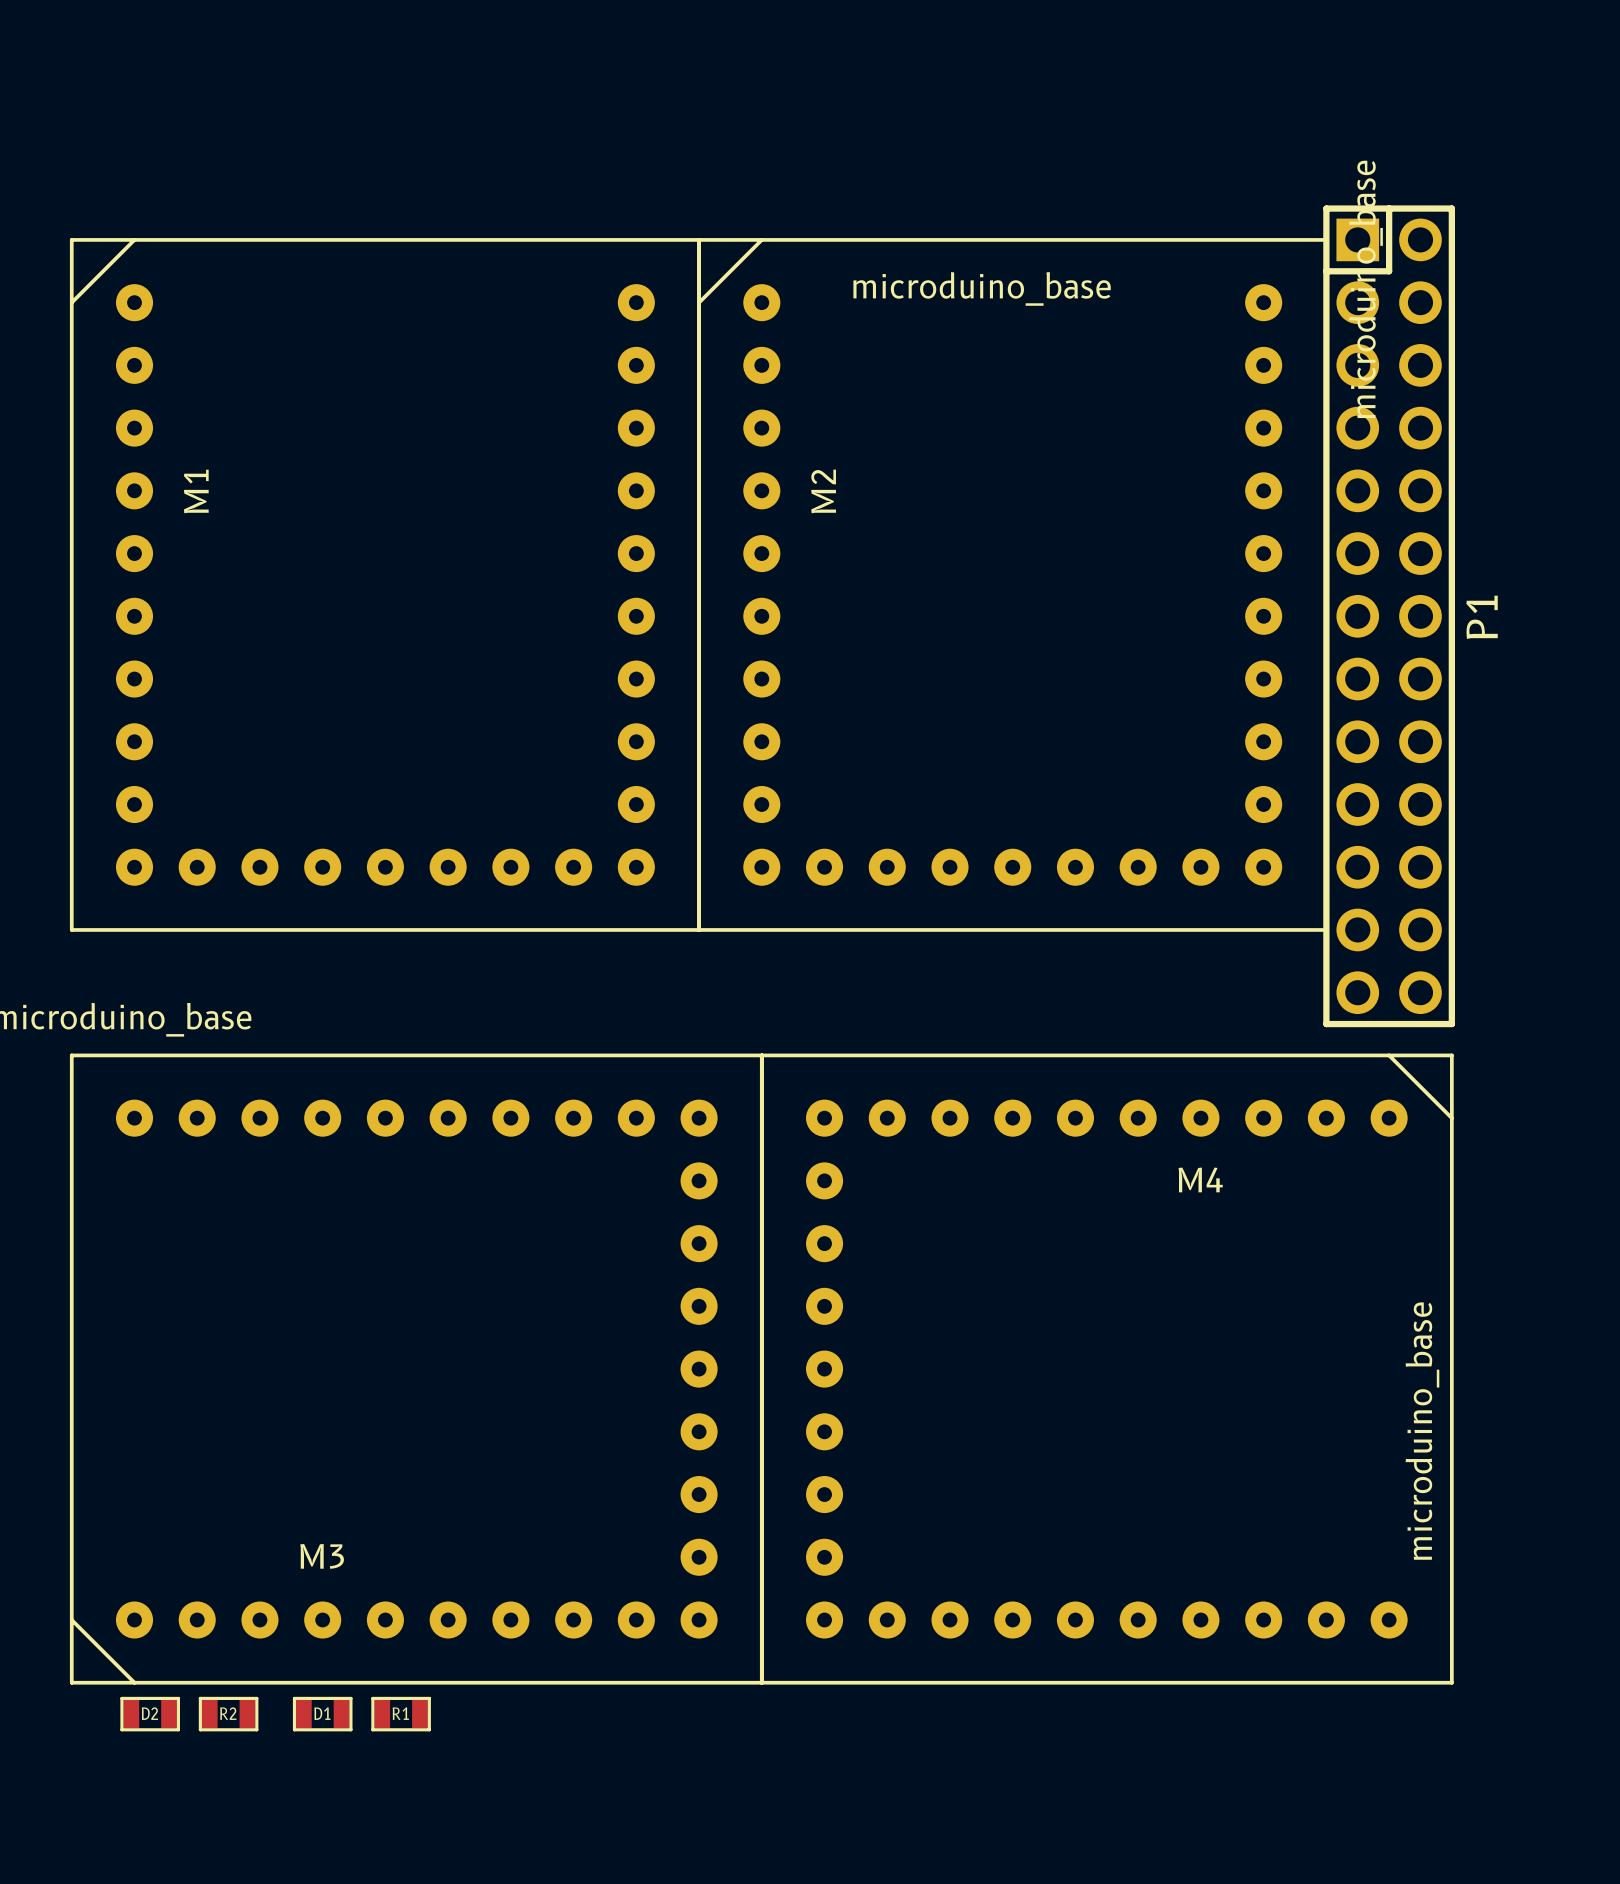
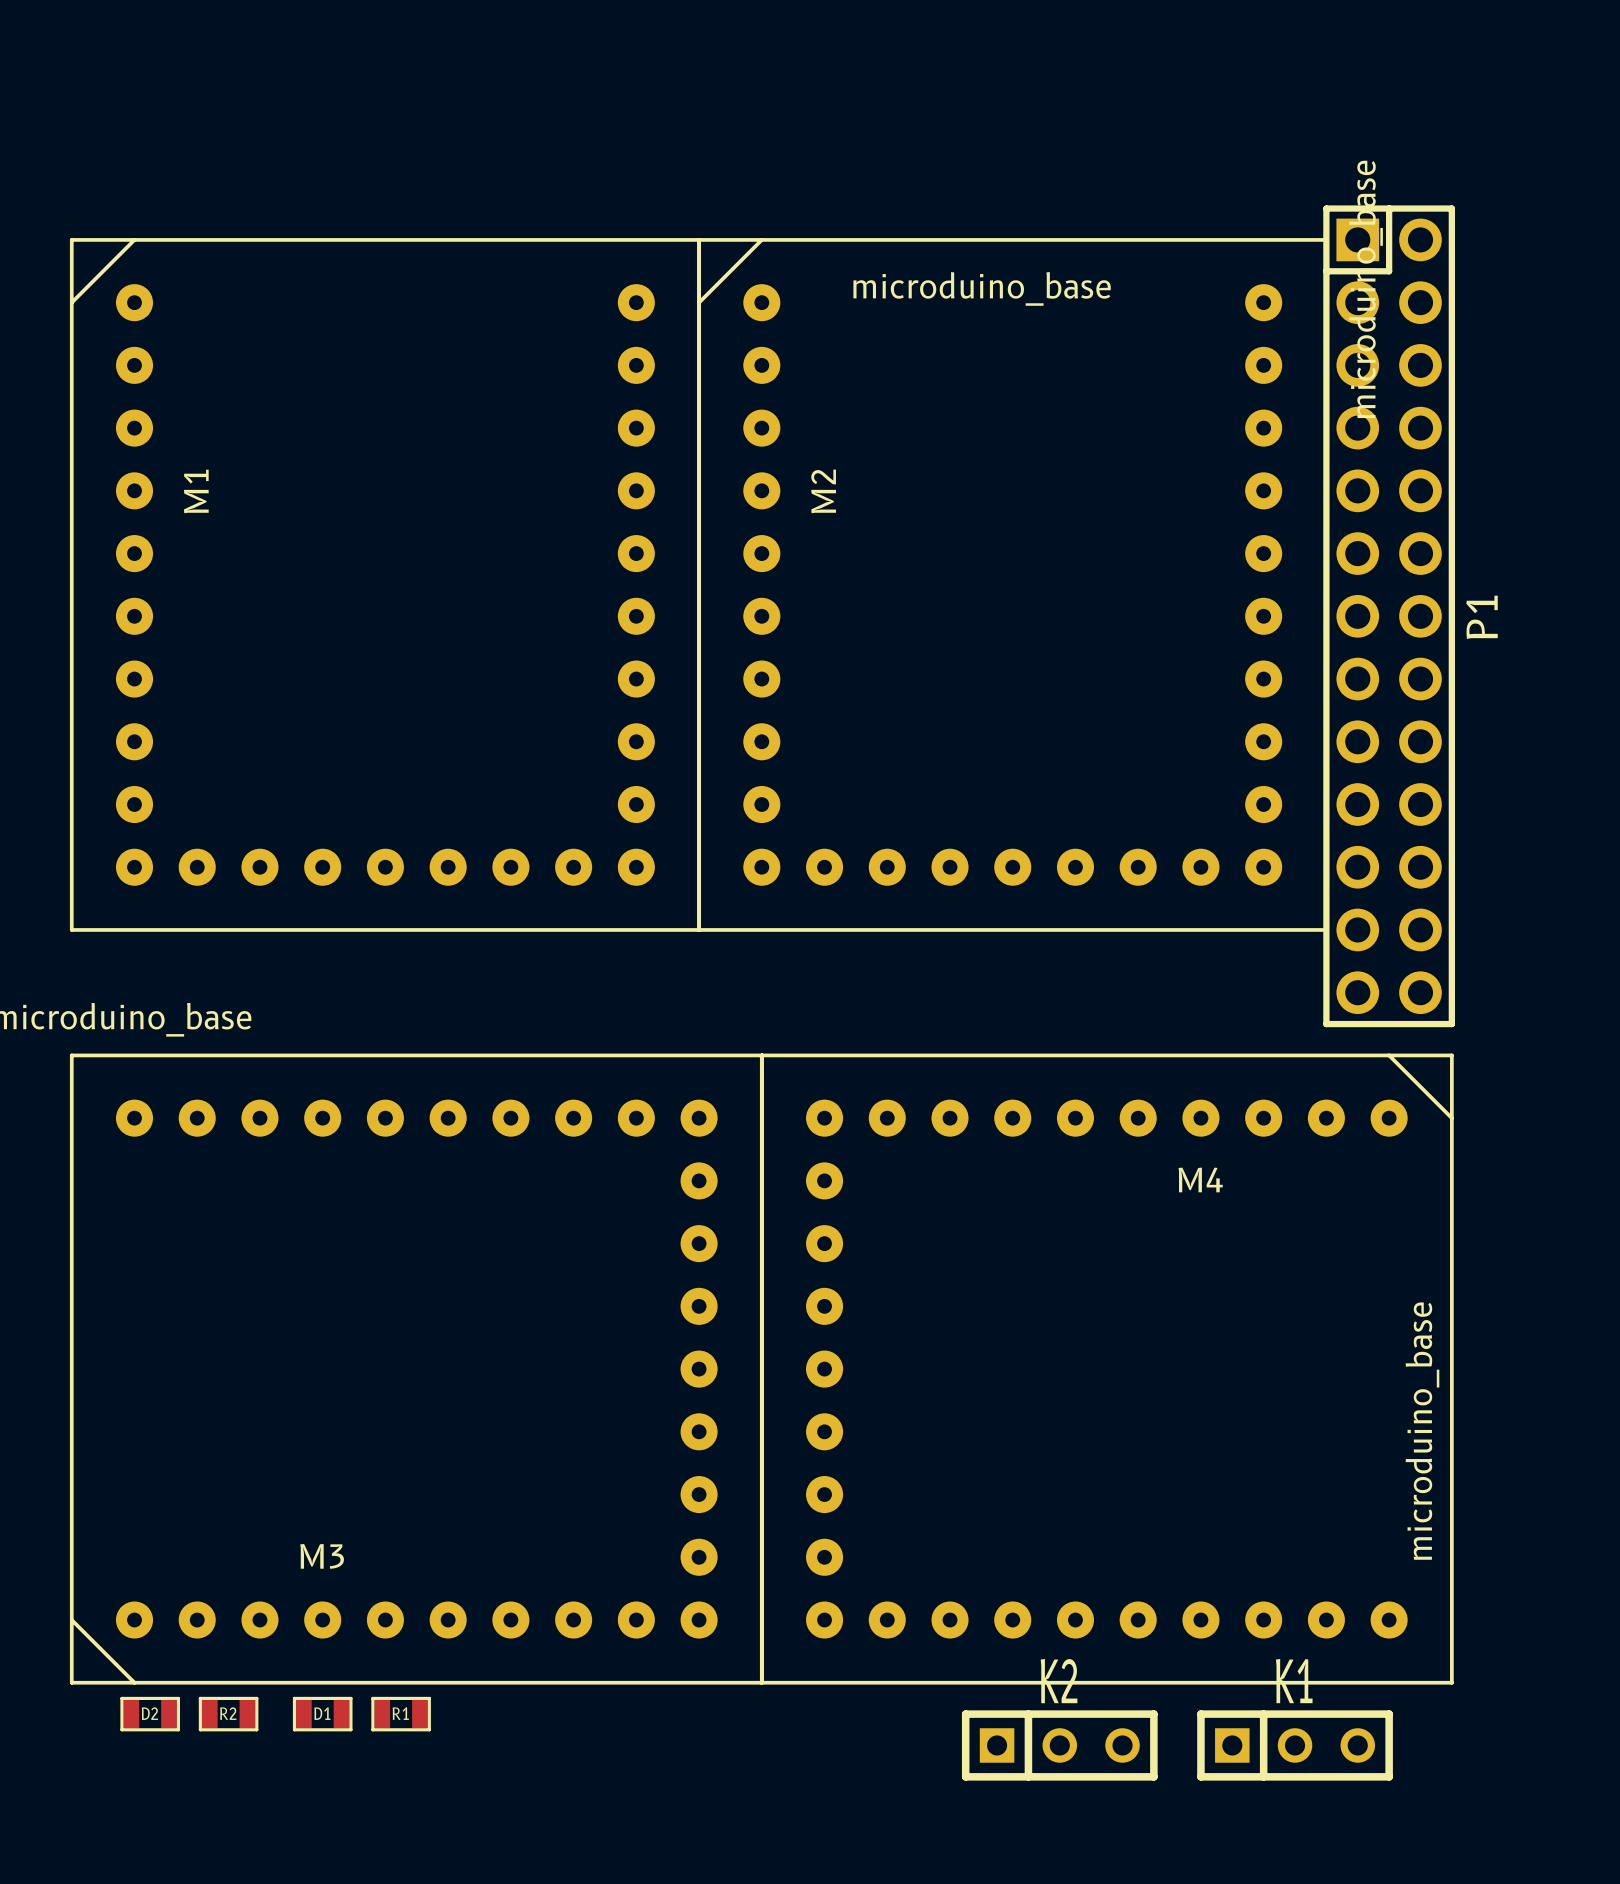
K2: none -> (1059, 1745)
K1: none -> (1295, 1745)

